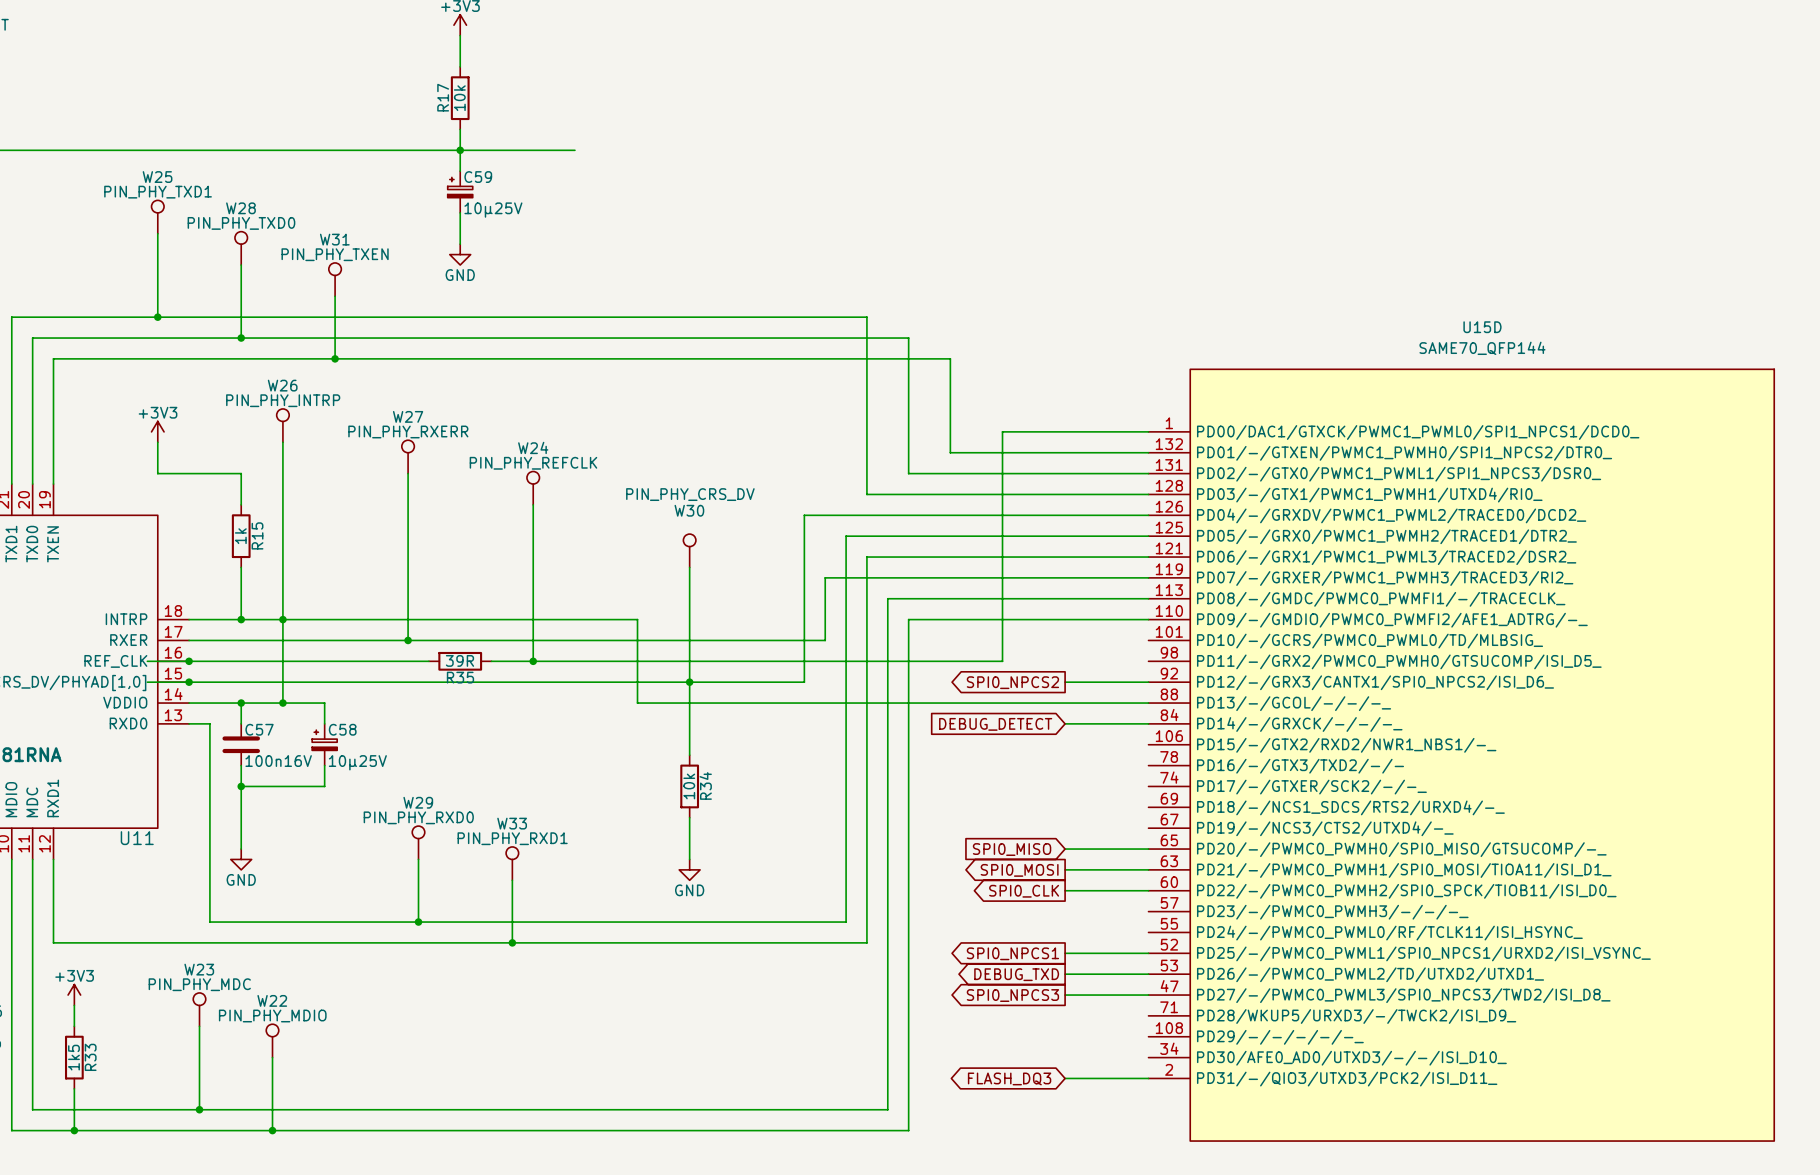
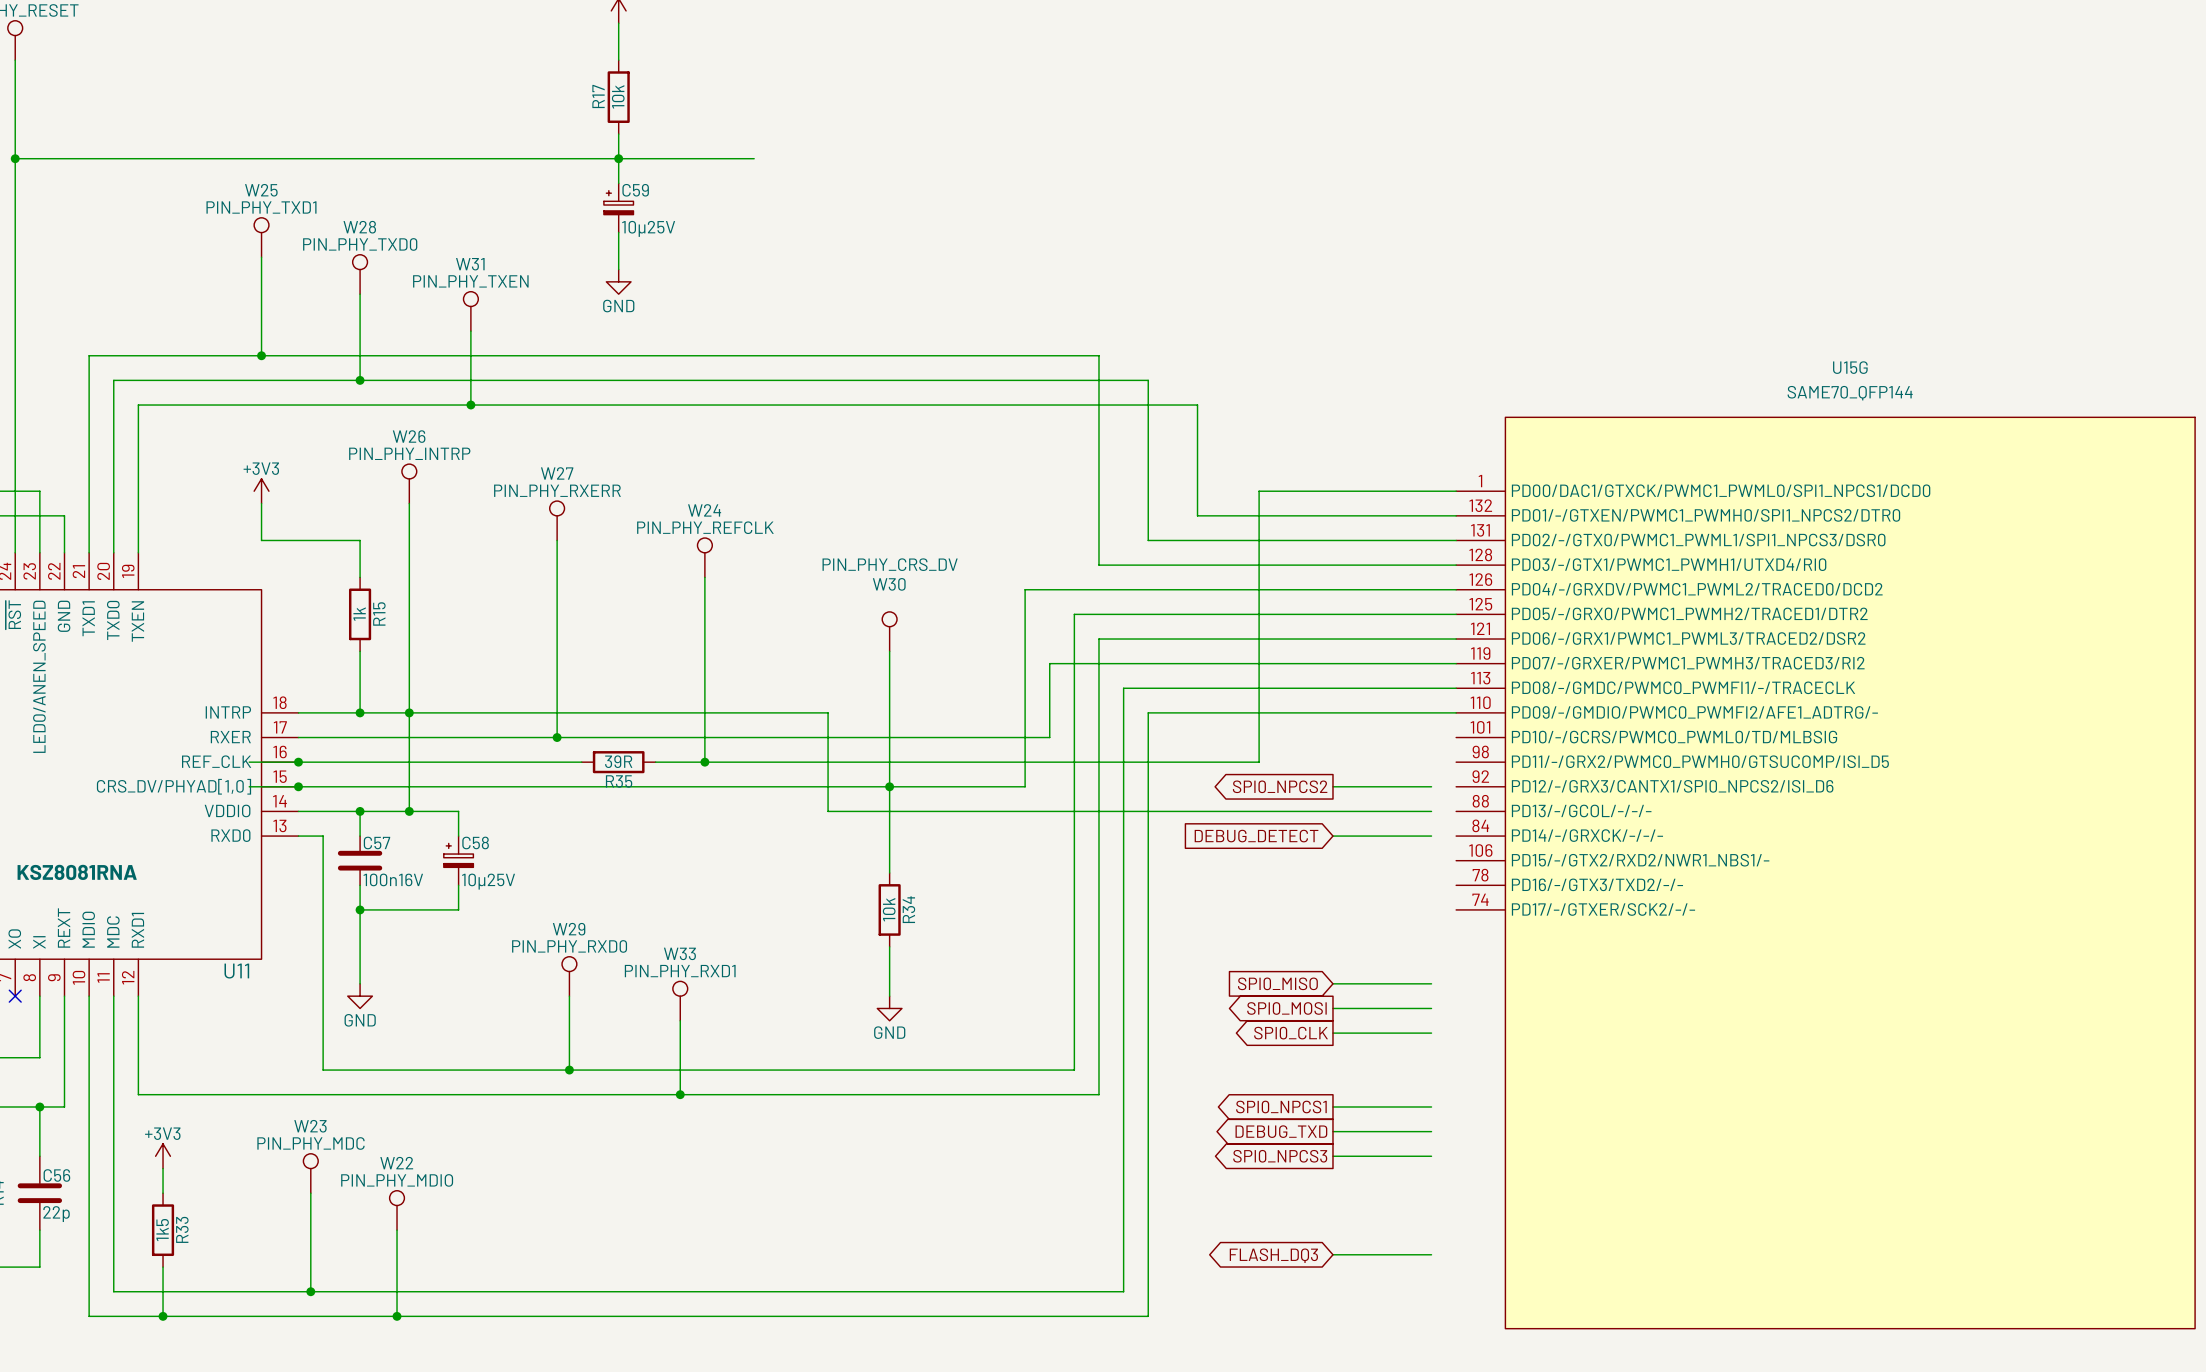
U15D: SAME70_QFP144 (1461, 755) -> none
U15G: none -> SAME70_QFP144 (1825, 873)

